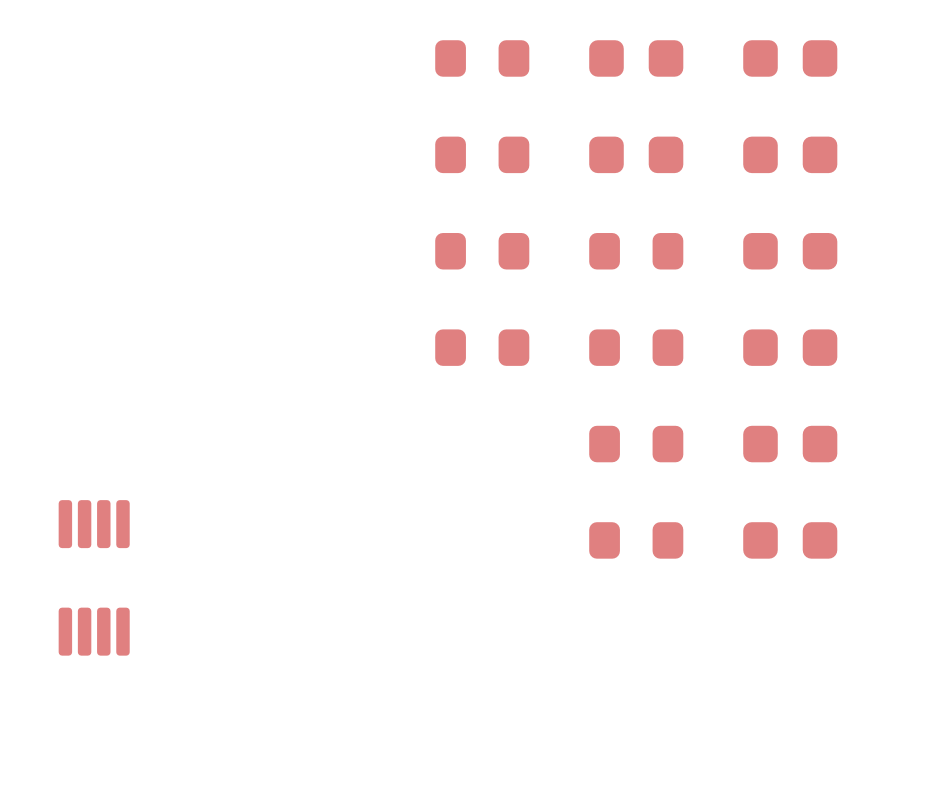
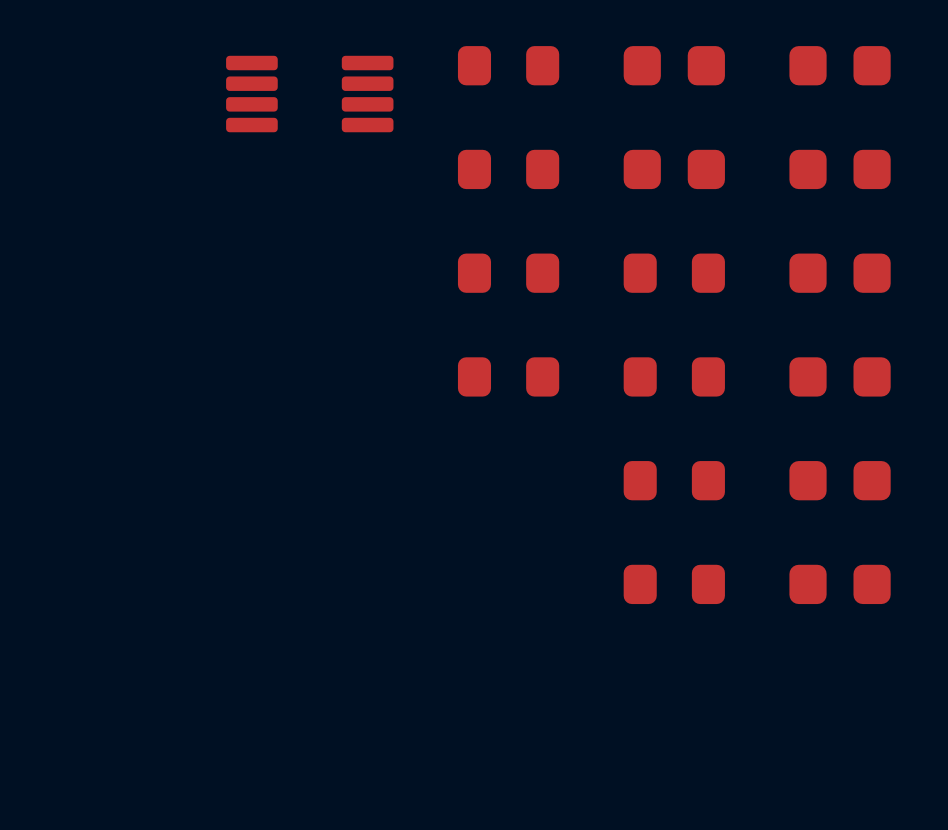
part rotation: 0° (94, 577) -> 90° clockwise (309, 94)
part position: (94, 577) -> (309, 94)

